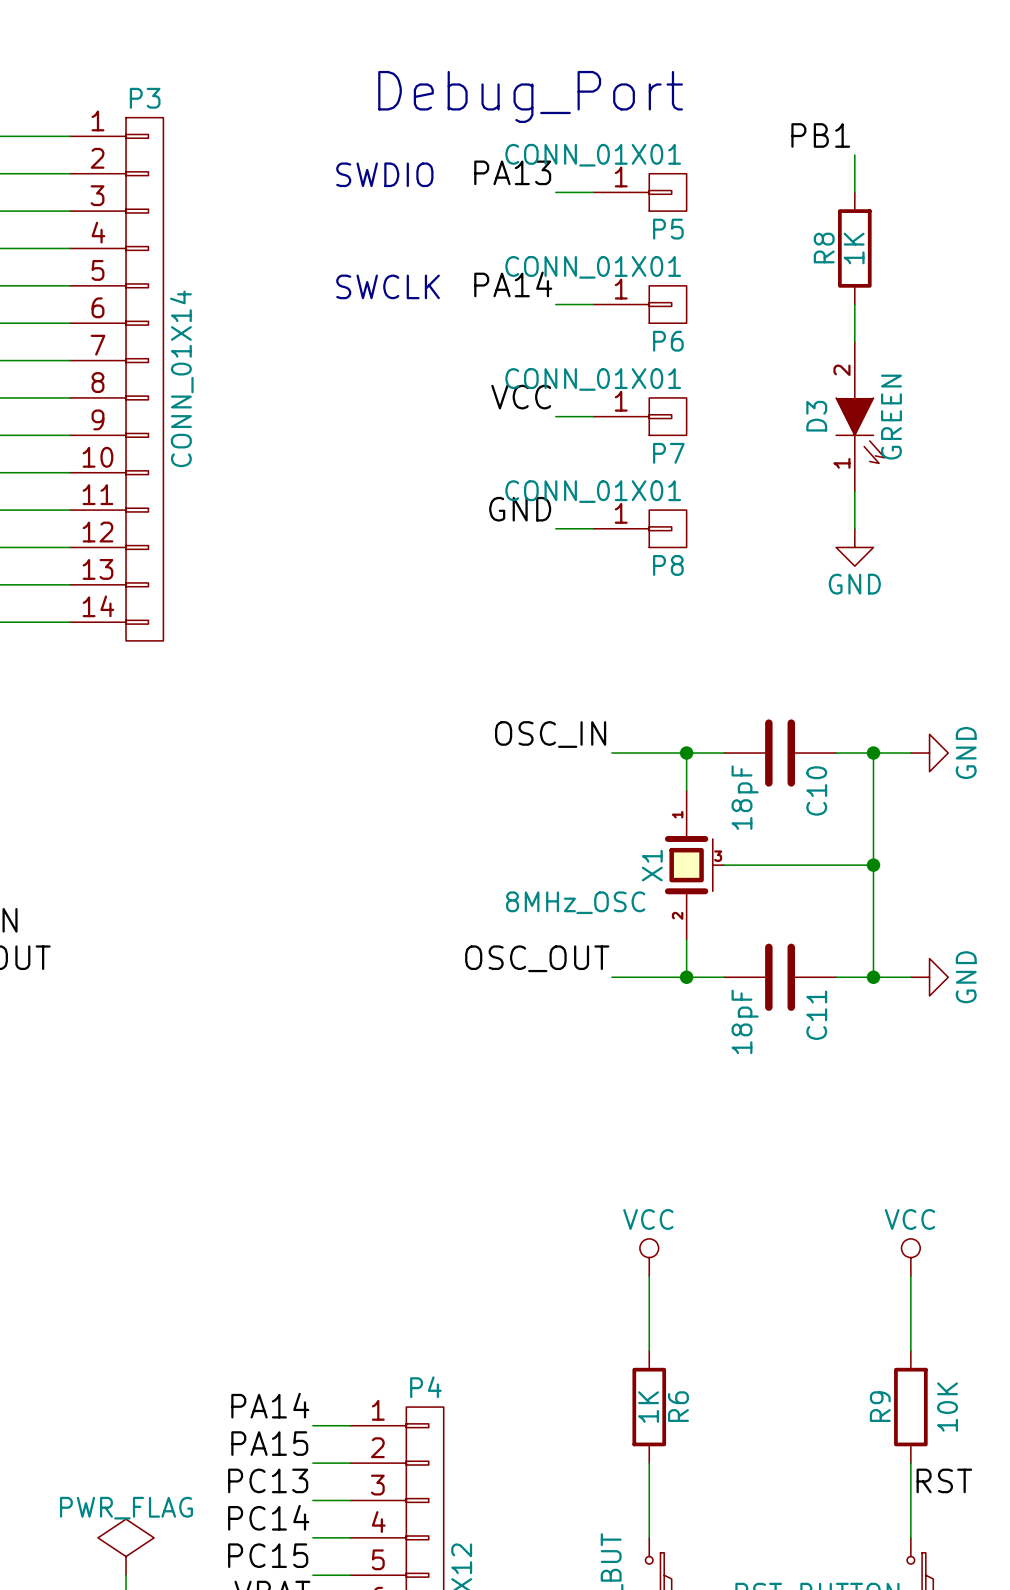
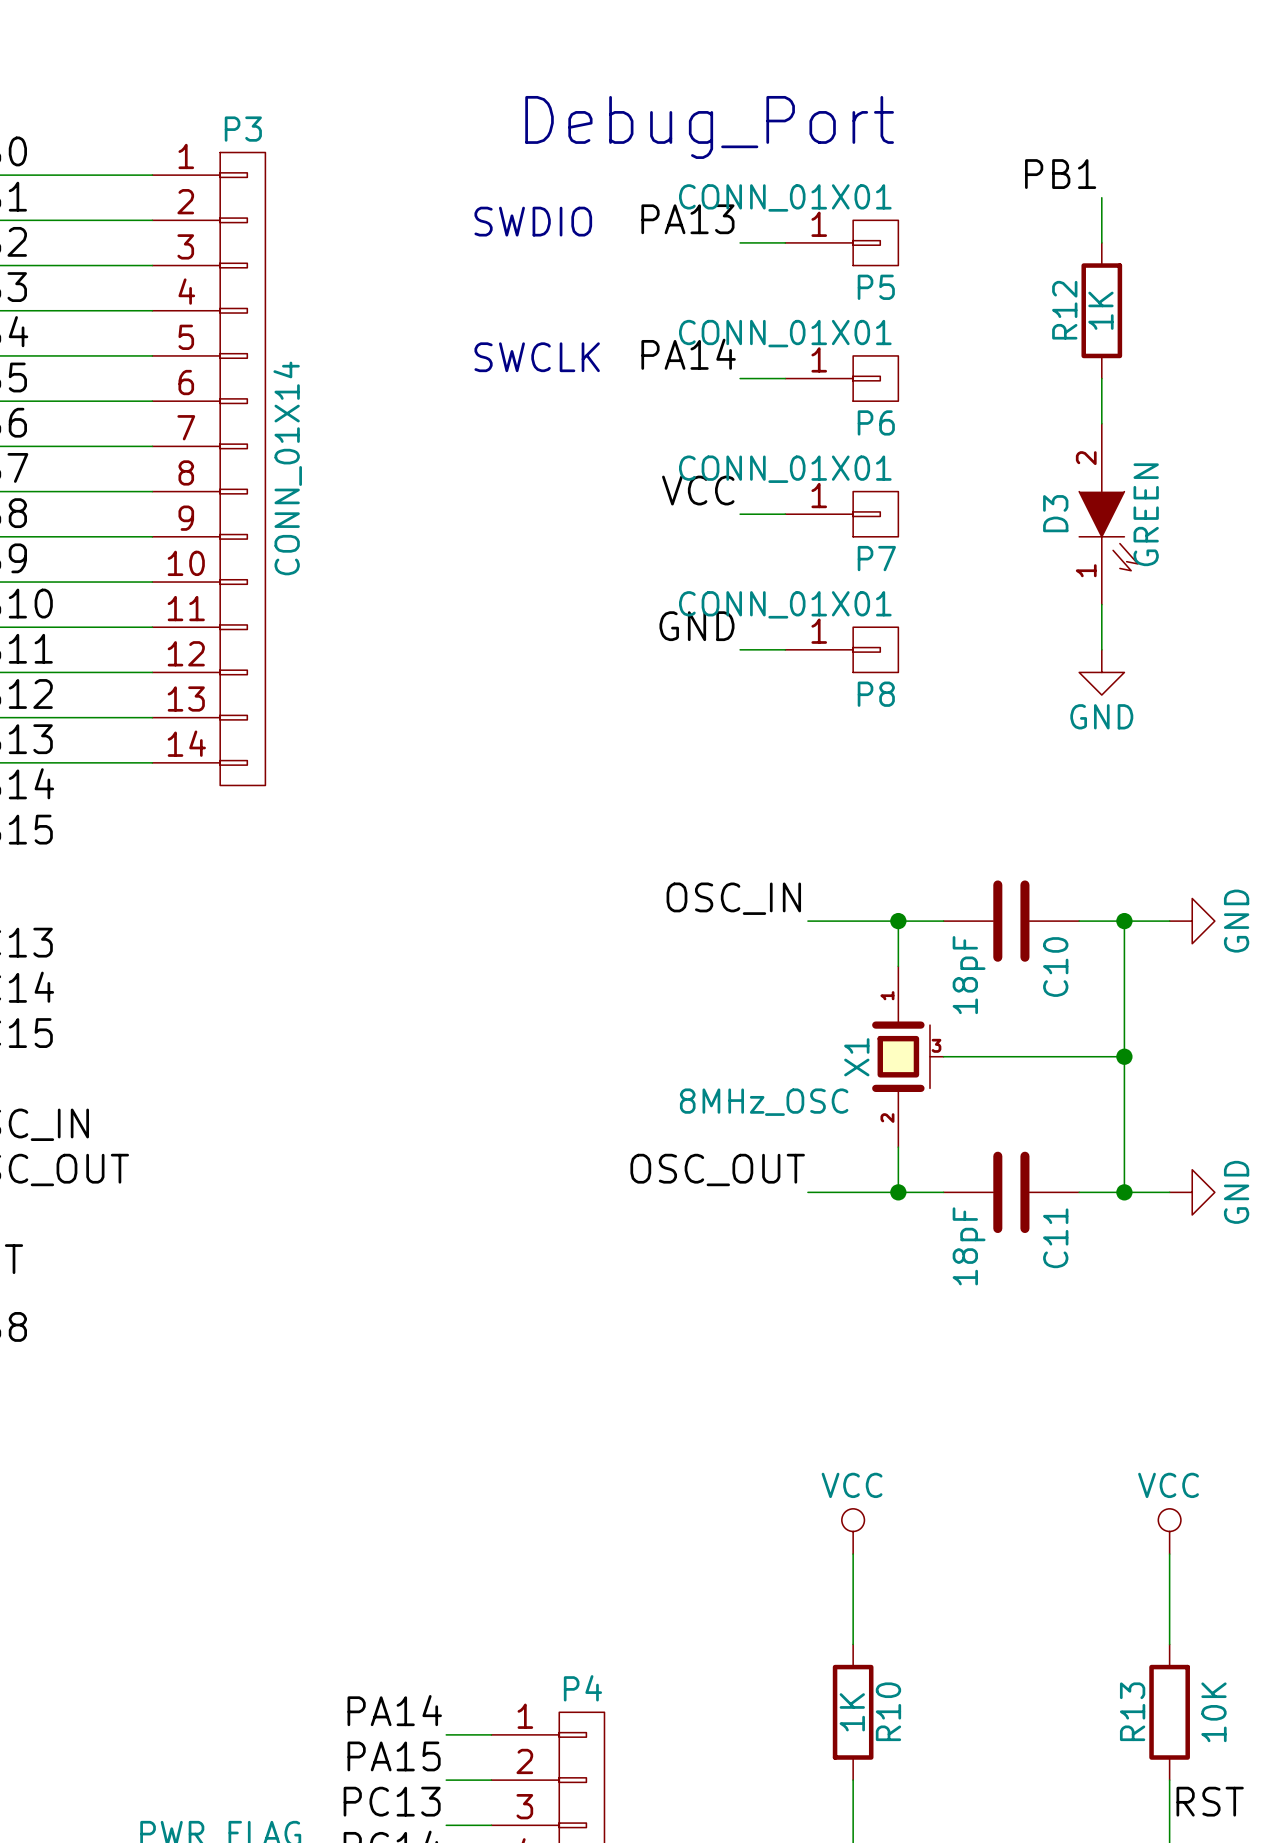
R8 name: R8 (824, 248) -> R12 (1064, 310)
R6 name: R6 (678, 1406) -> R10 (888, 1711)
R9 name: R9 (880, 1406) -> R13 (1132, 1711)

